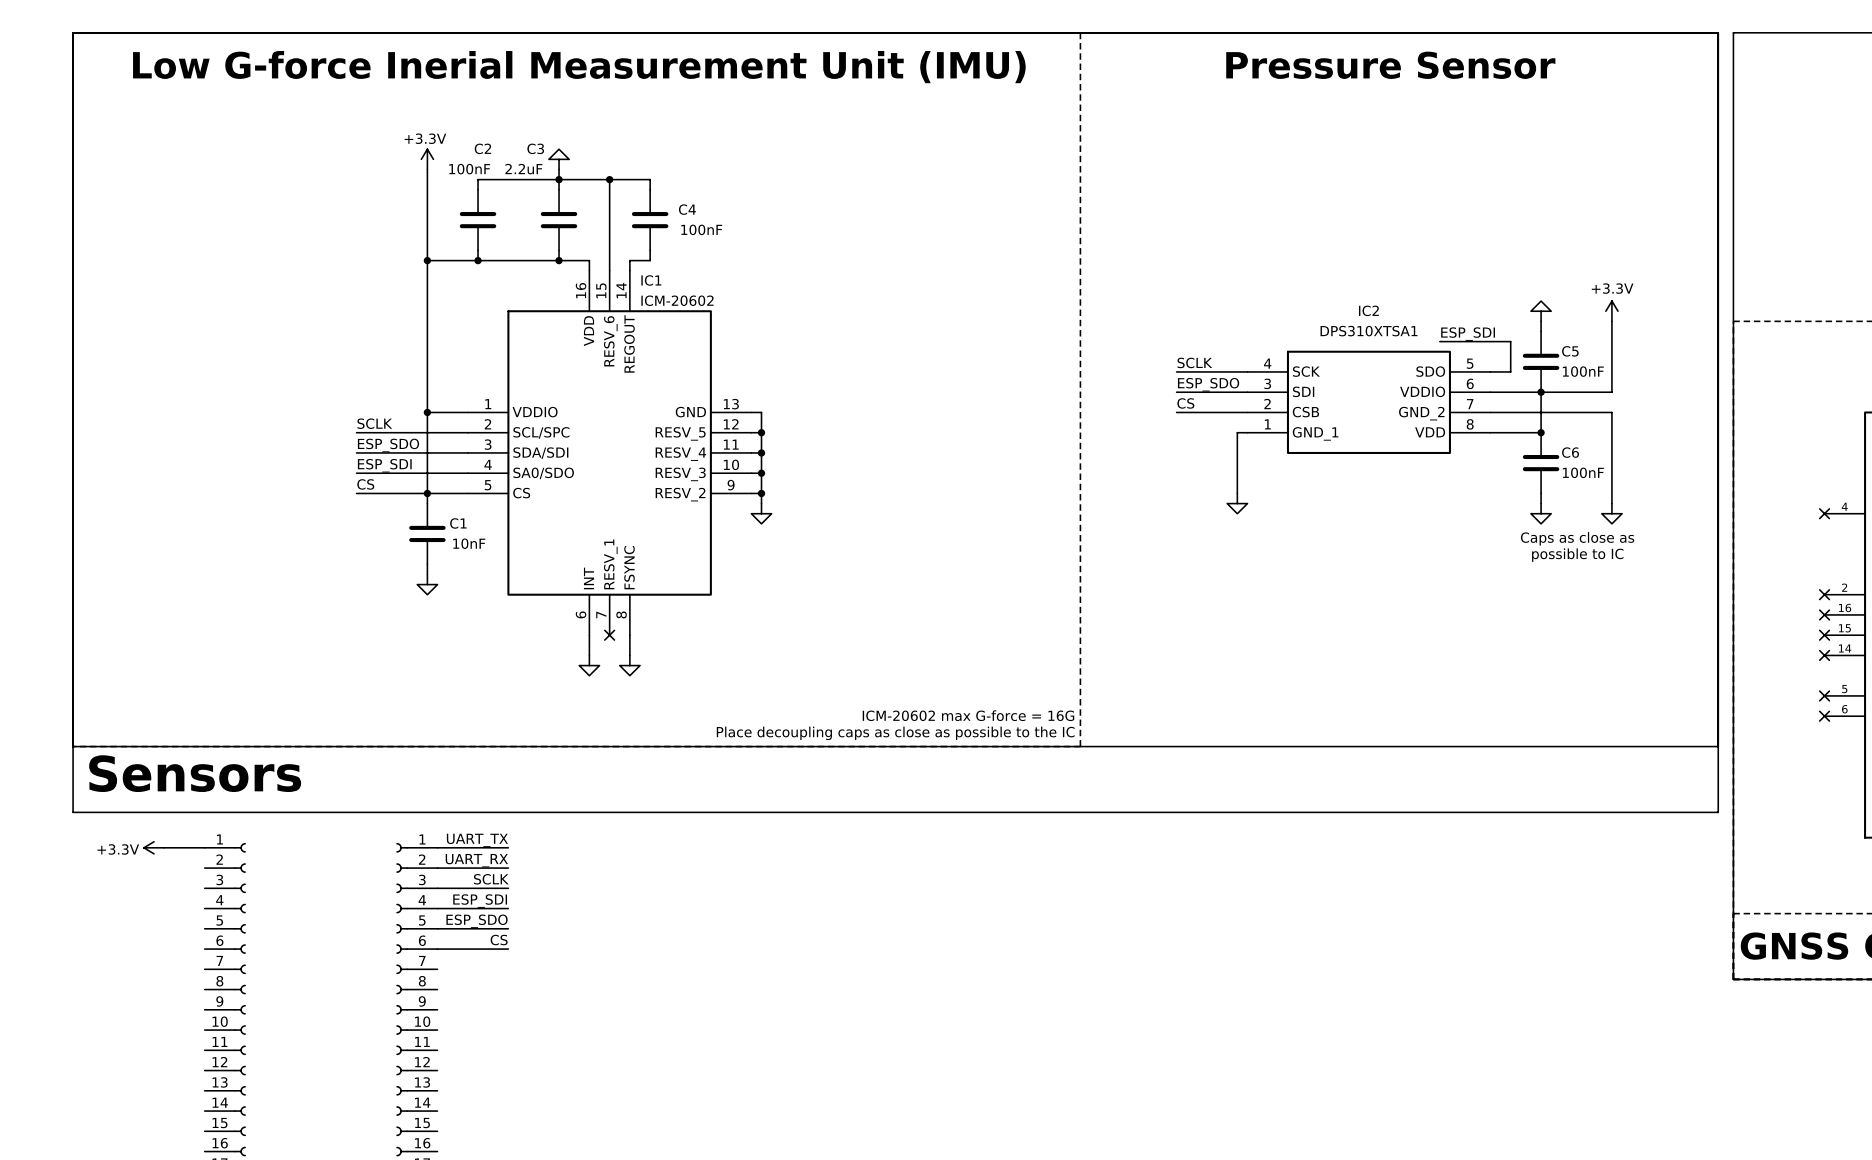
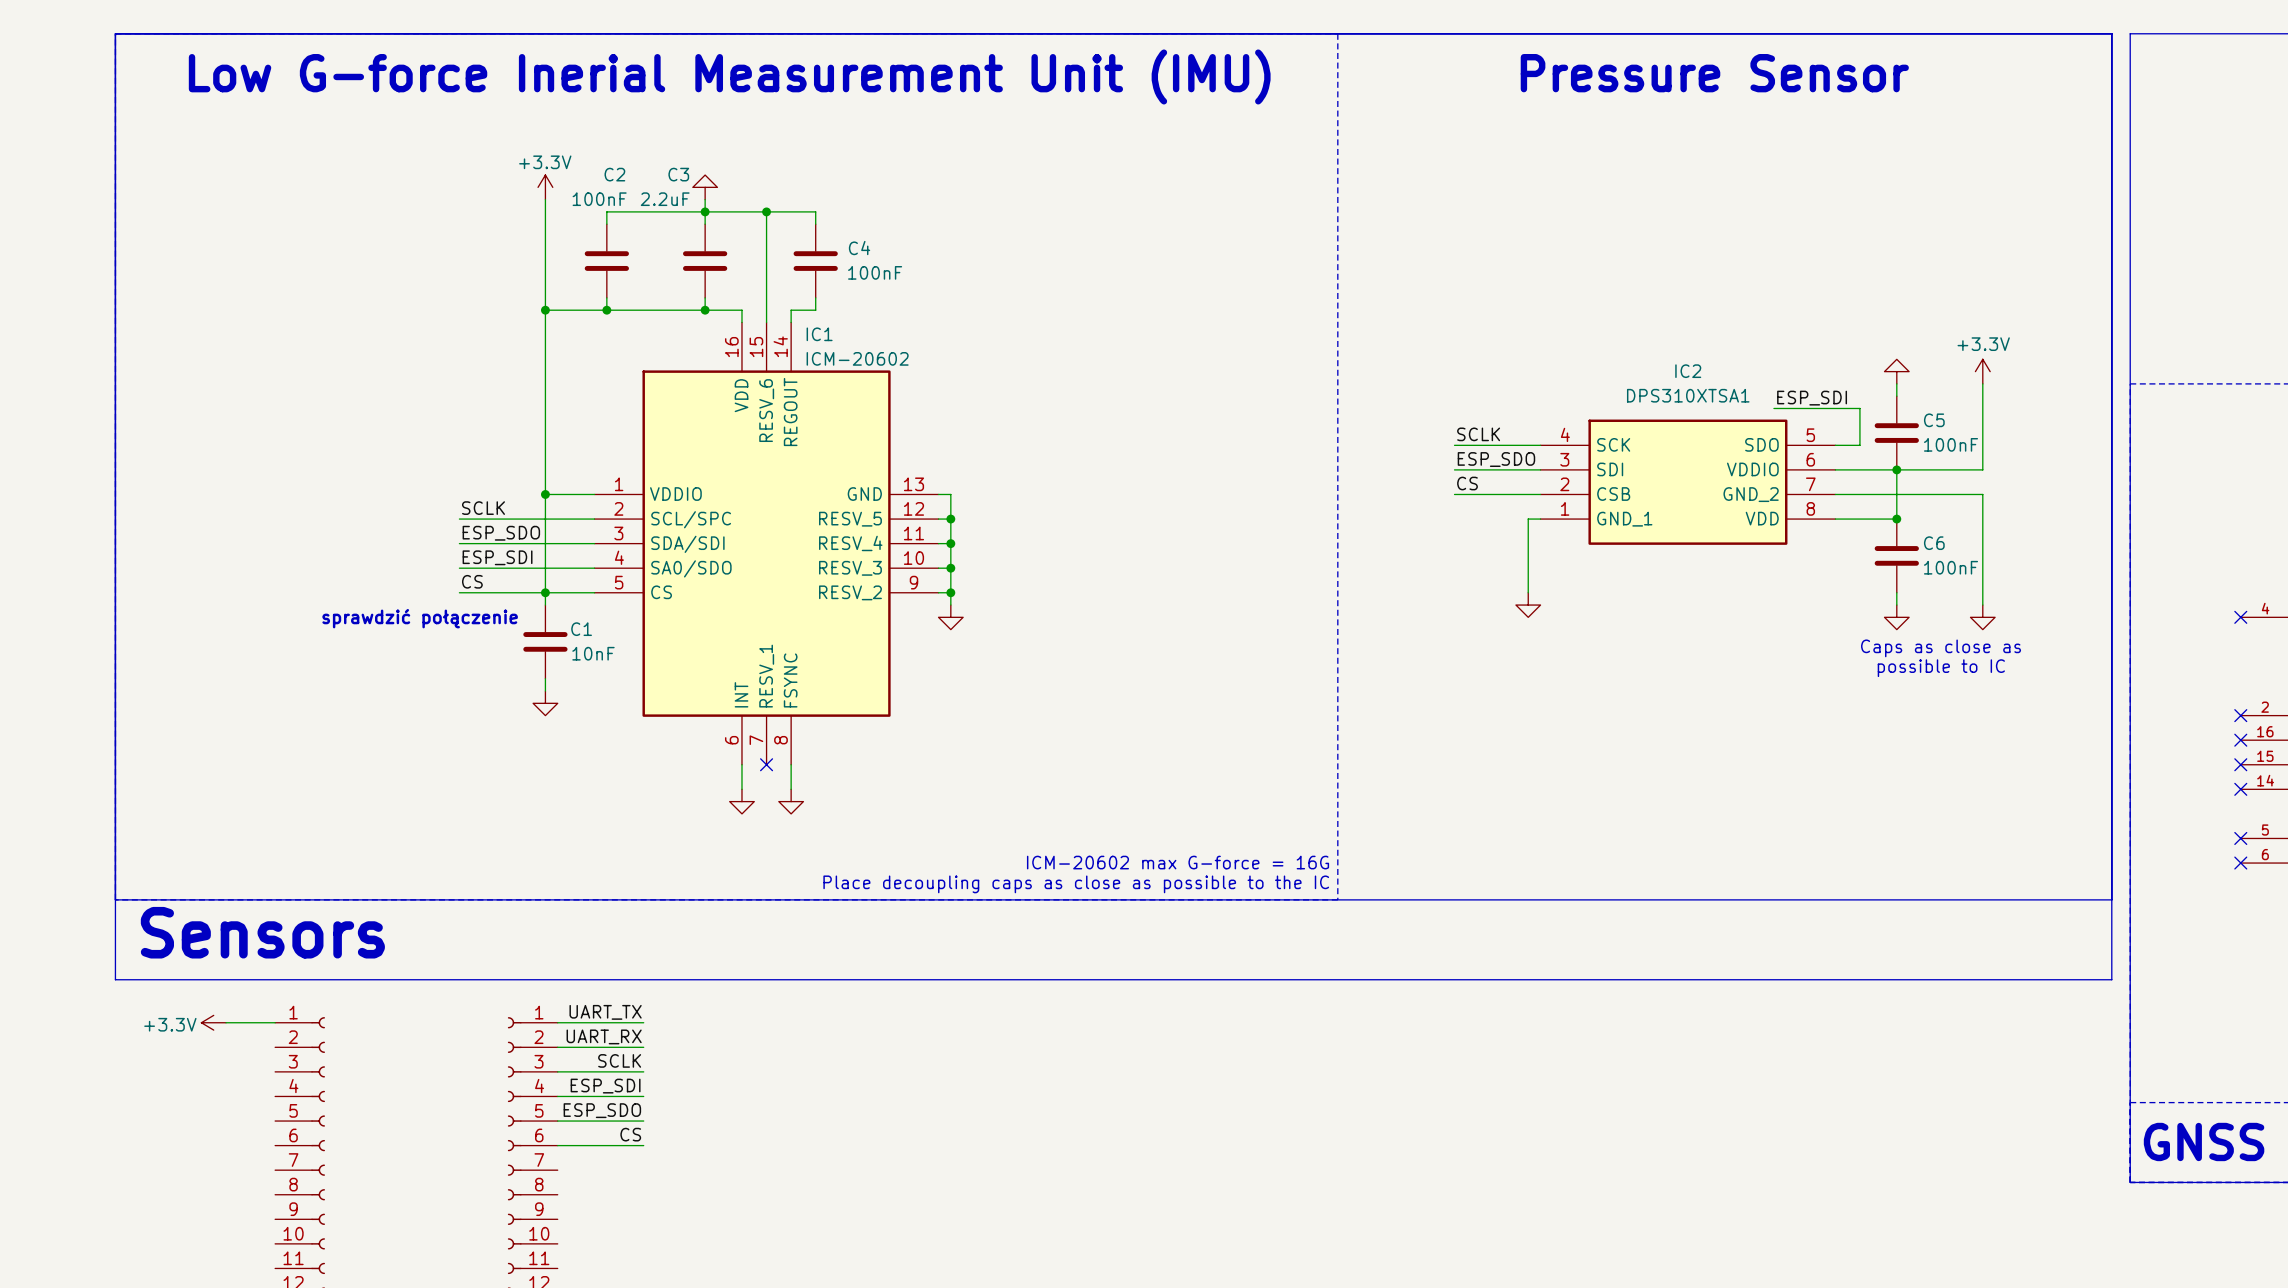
text: none -> sprawdzić połączenie (420, 618)

